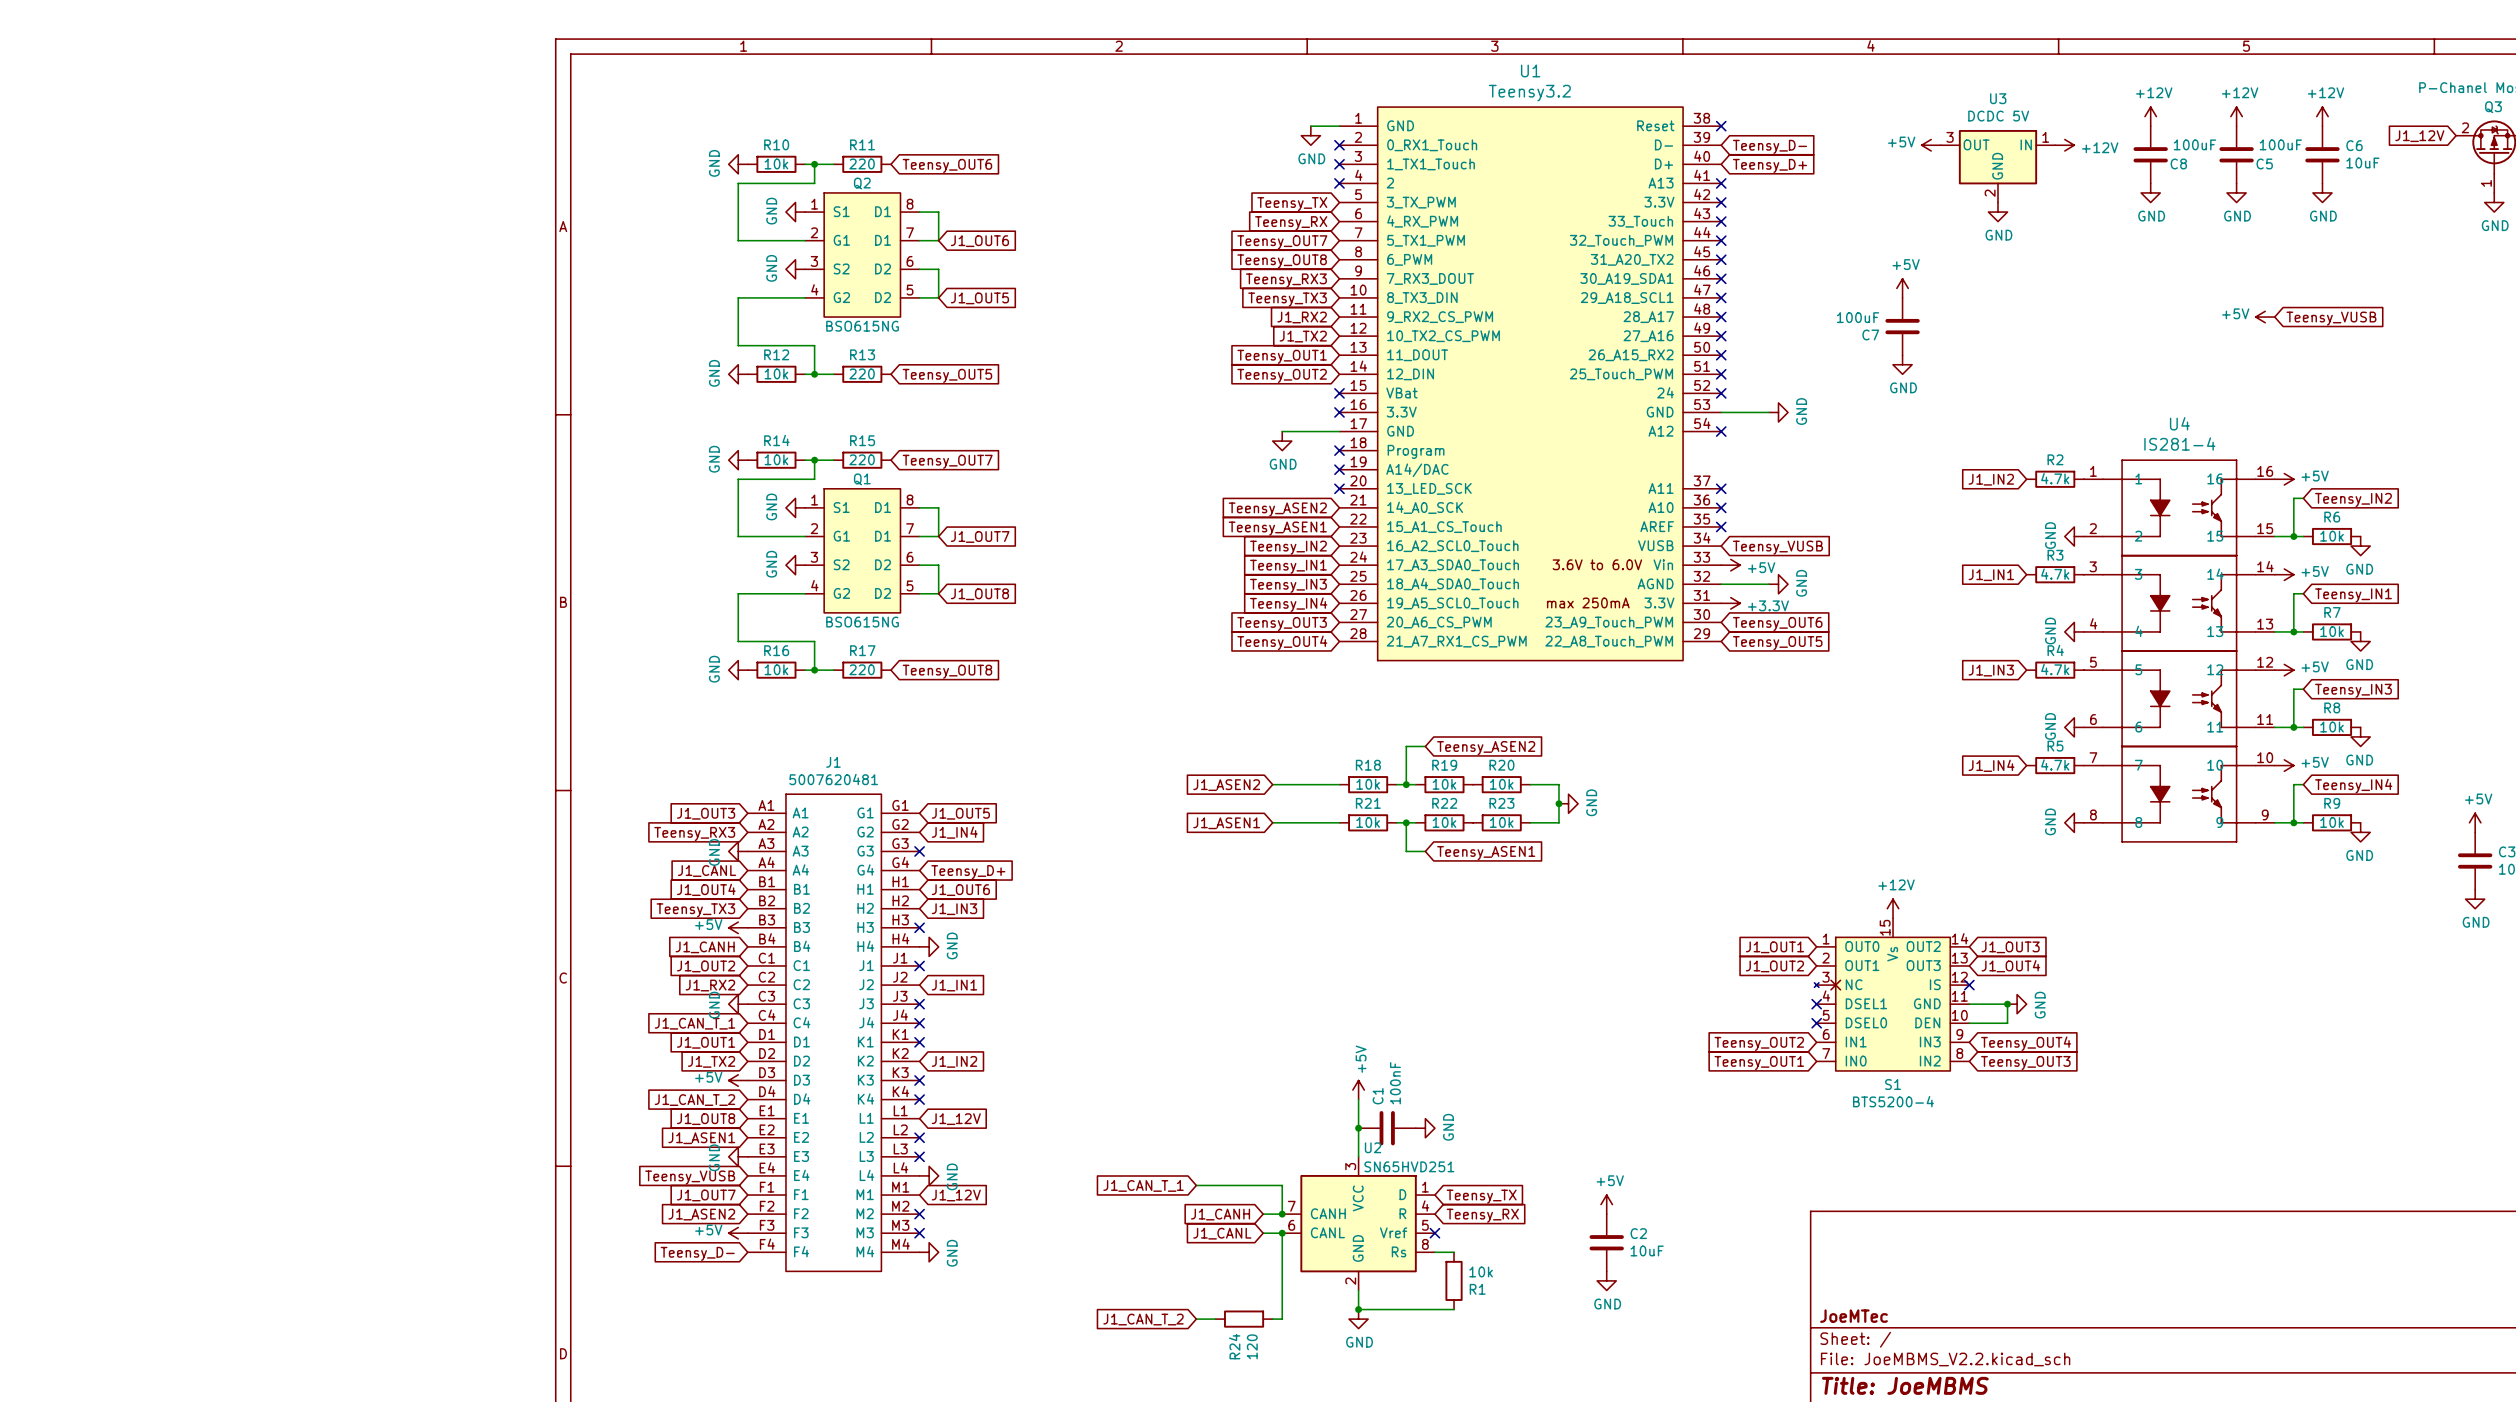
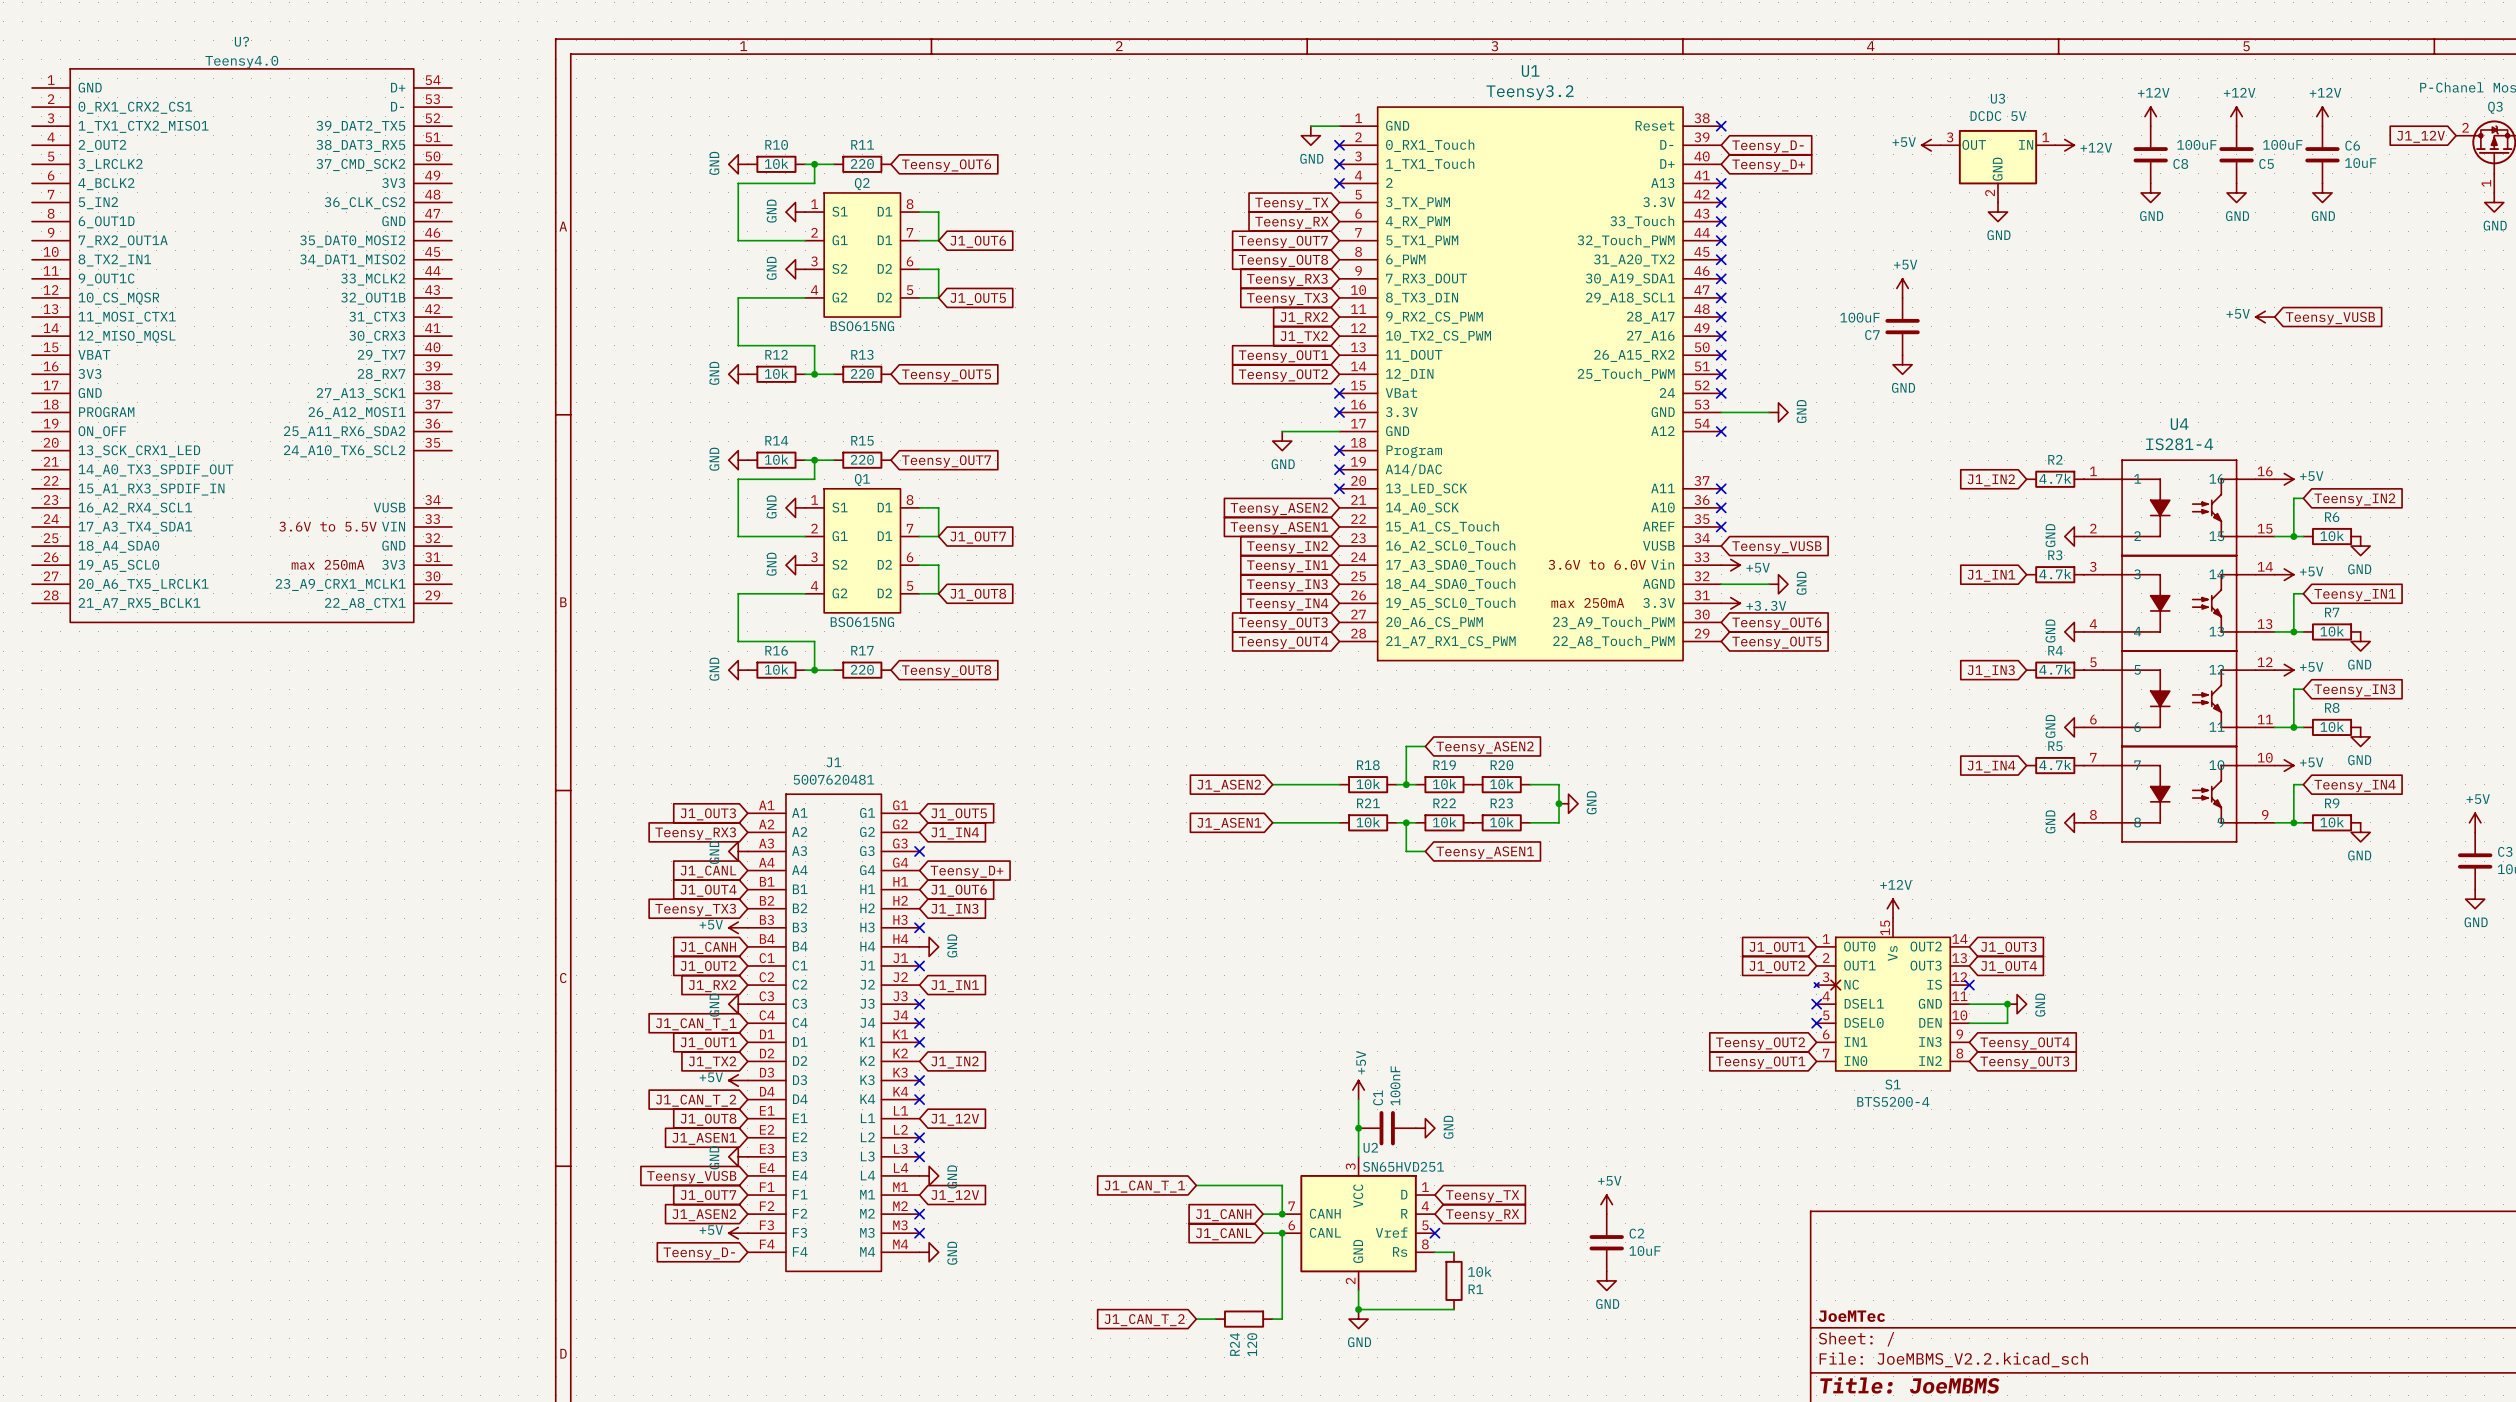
U?: none -> Teensy4.0 (242, 345)

